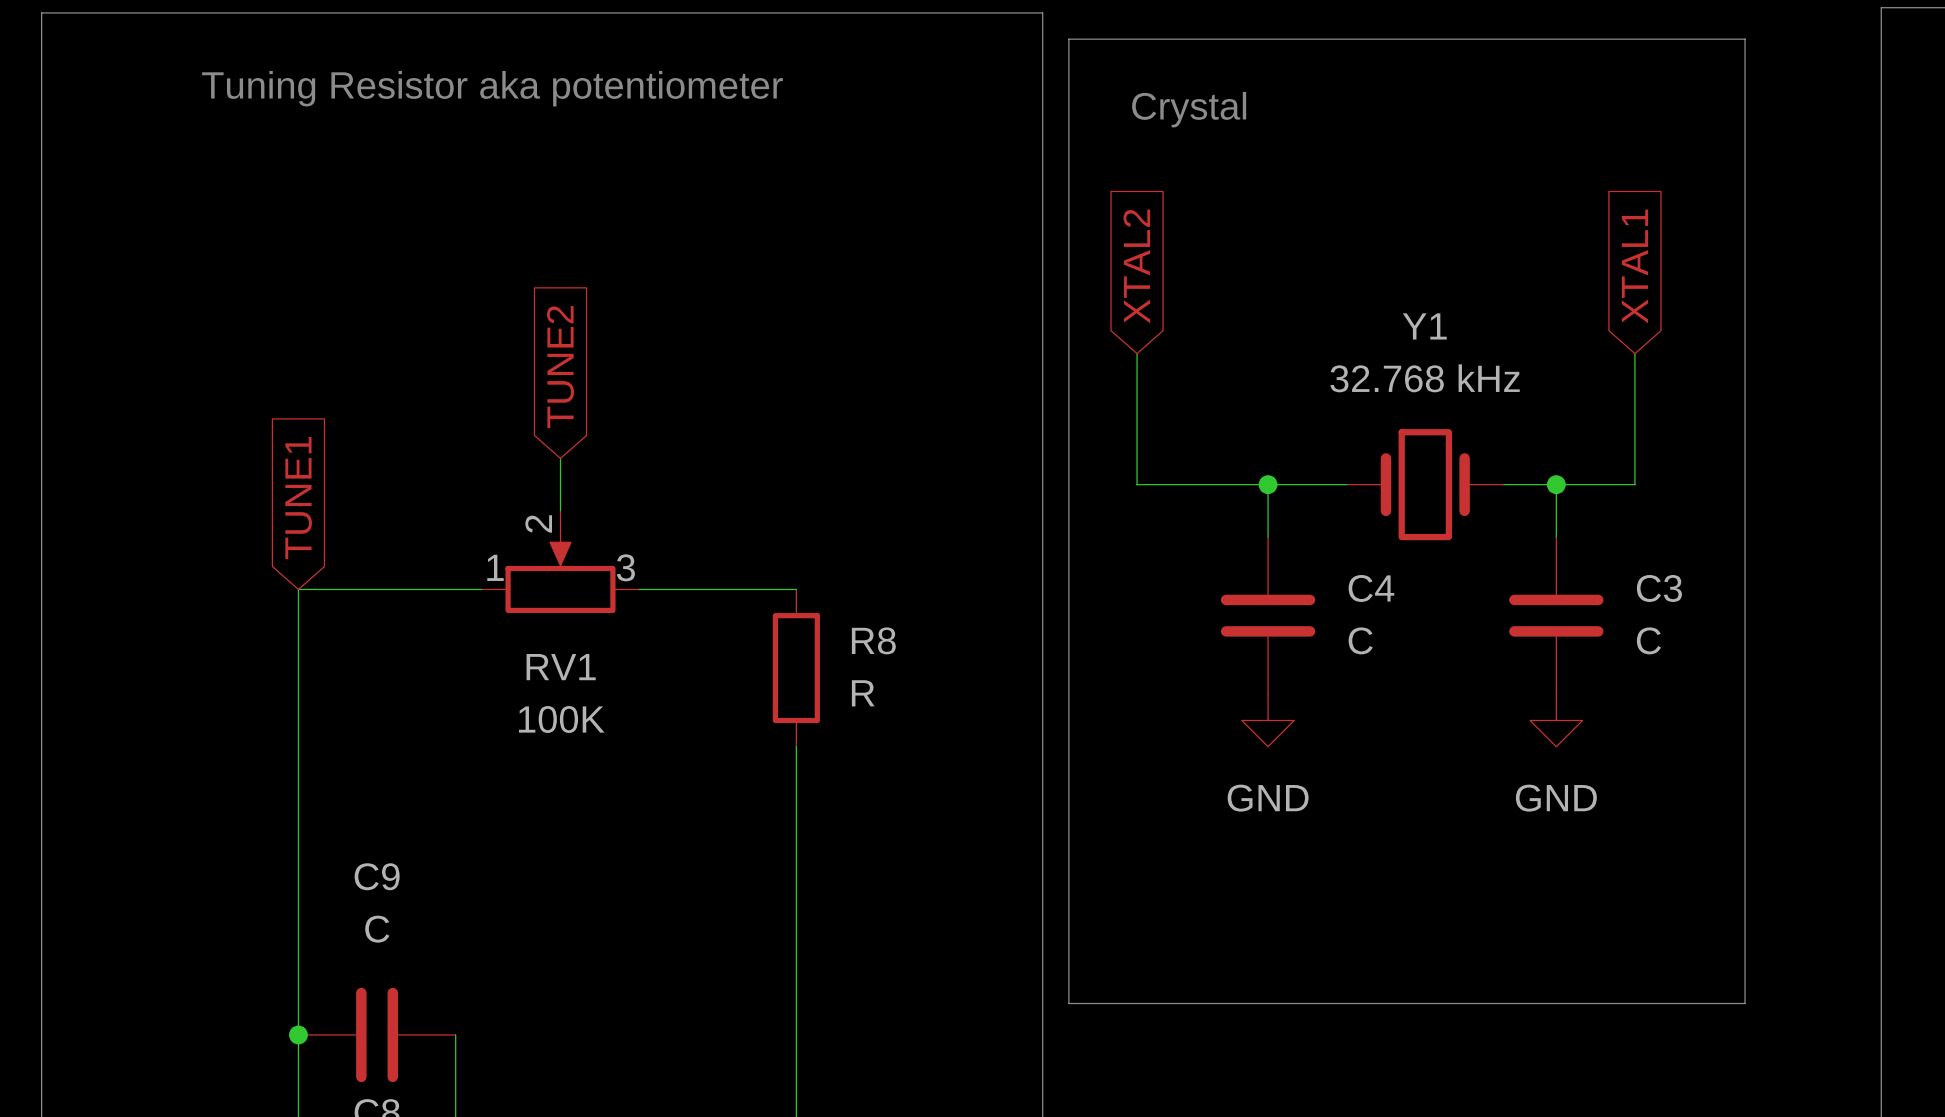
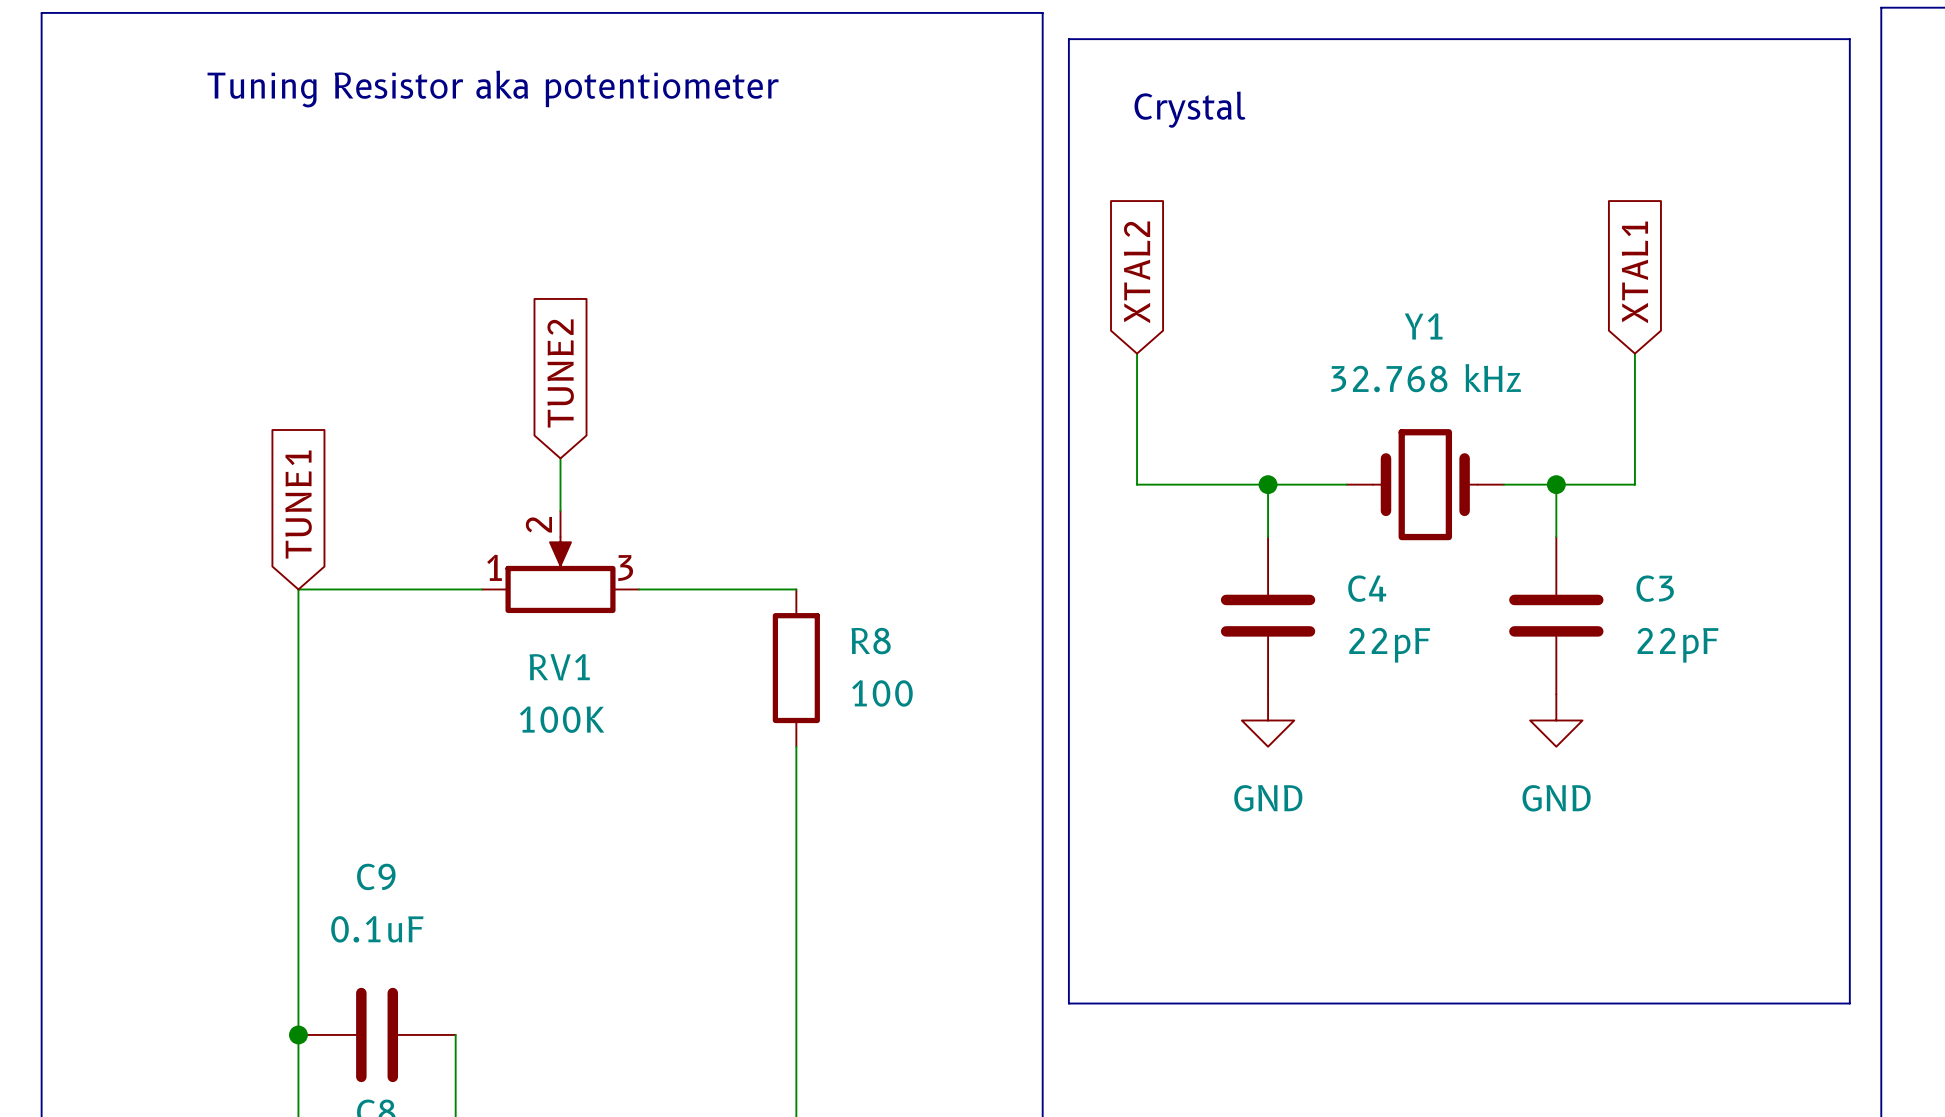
line: (1745, 39) (1745, 1003) -> (1745, 39) (1849, 39) (1849, 1003) (1745, 1003)
C4 value: C (1360, 640) -> 22pF (1389, 645)
C3 value: C (1648, 640) -> 22pF (1678, 645)
R8 value: R (863, 693) -> 100 (882, 693)
C9 value: C (377, 929) -> 0.1uF (377, 929)

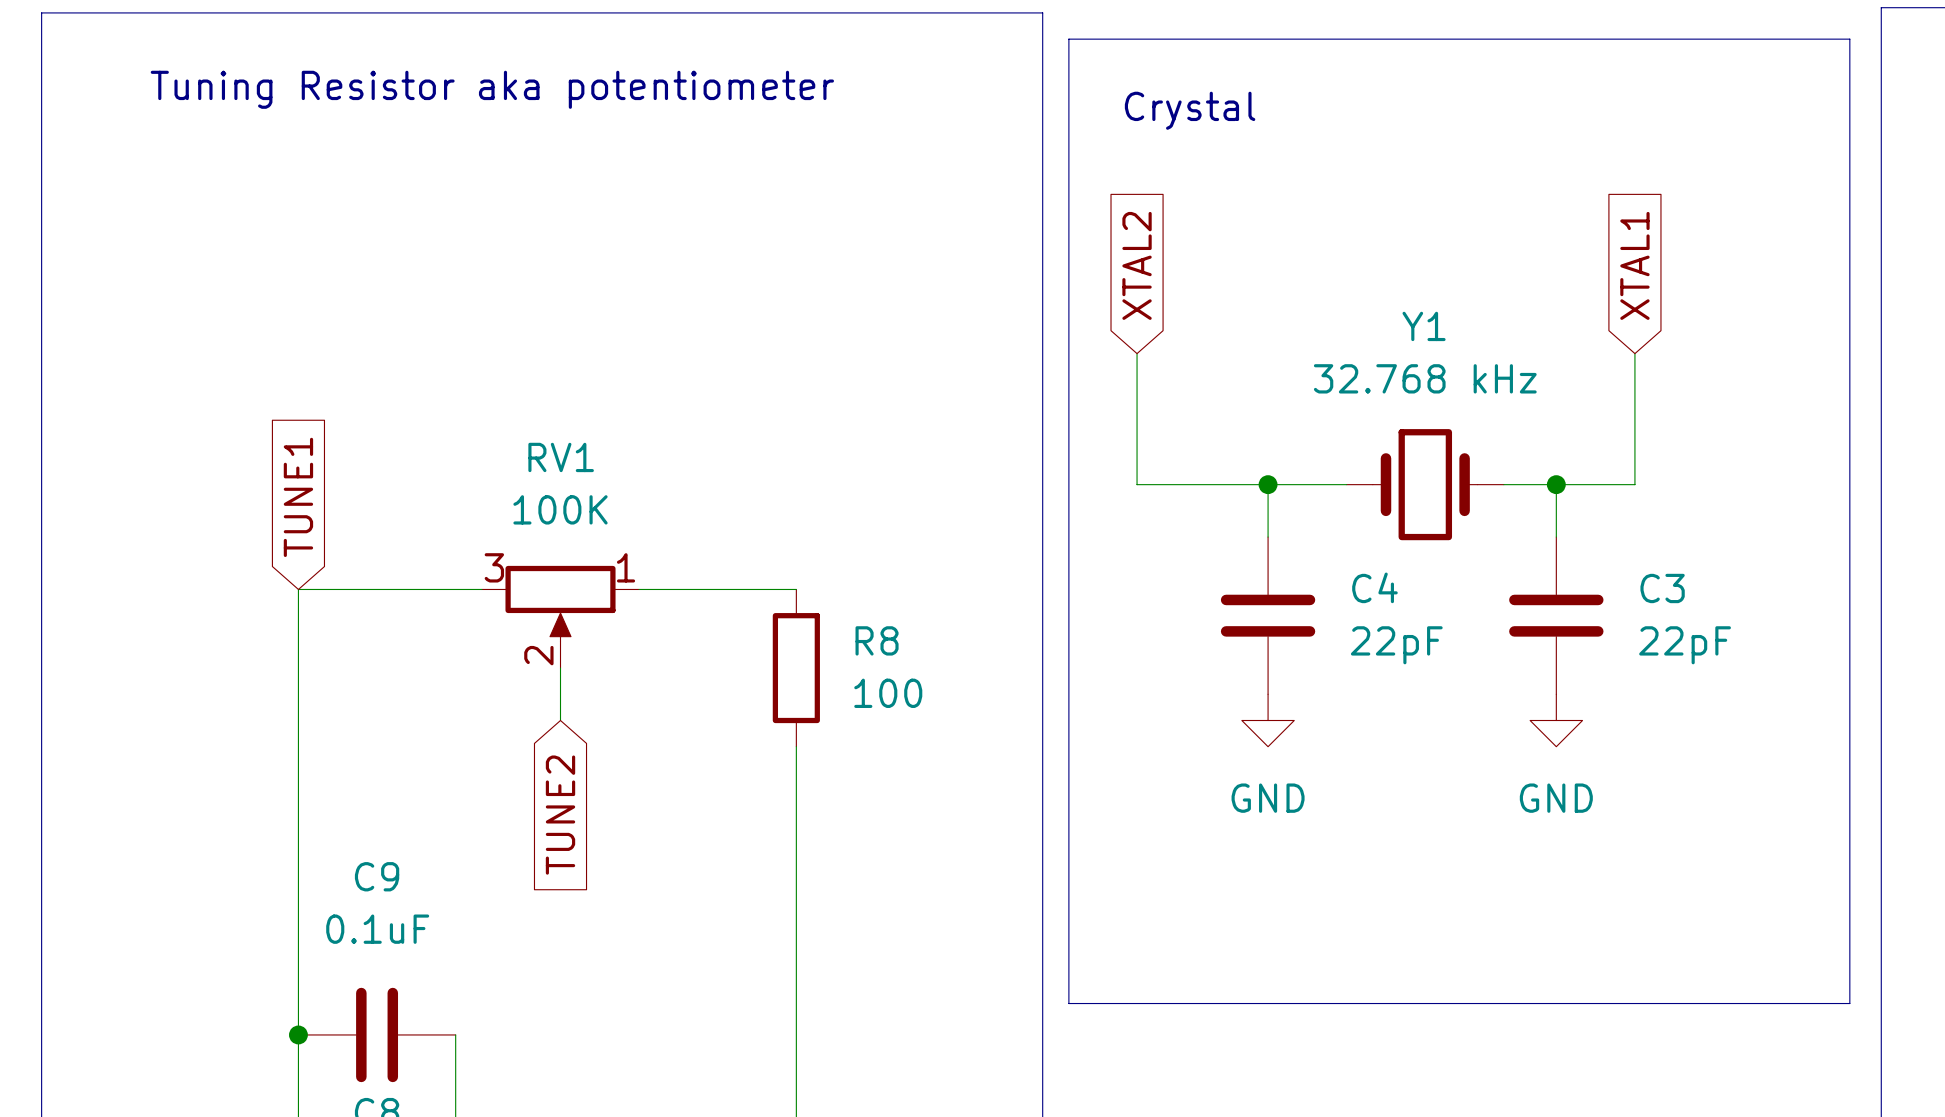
global label rotation: 0° (560, 373) -> 180° (560, 815)
global label position: TUNE2 (560, 373) -> TUNE2 (560, 815)
wire: (560, 458) (560, 510) -> (560, 668) (560, 720)
RV1 rotation: 0° (560, 575) -> 180° (560, 603)
RV1 name position: RV1 (559, 667) -> RV1 (561, 457)
RV1 value position: 100K (562, 719) -> 100K (560, 509)

